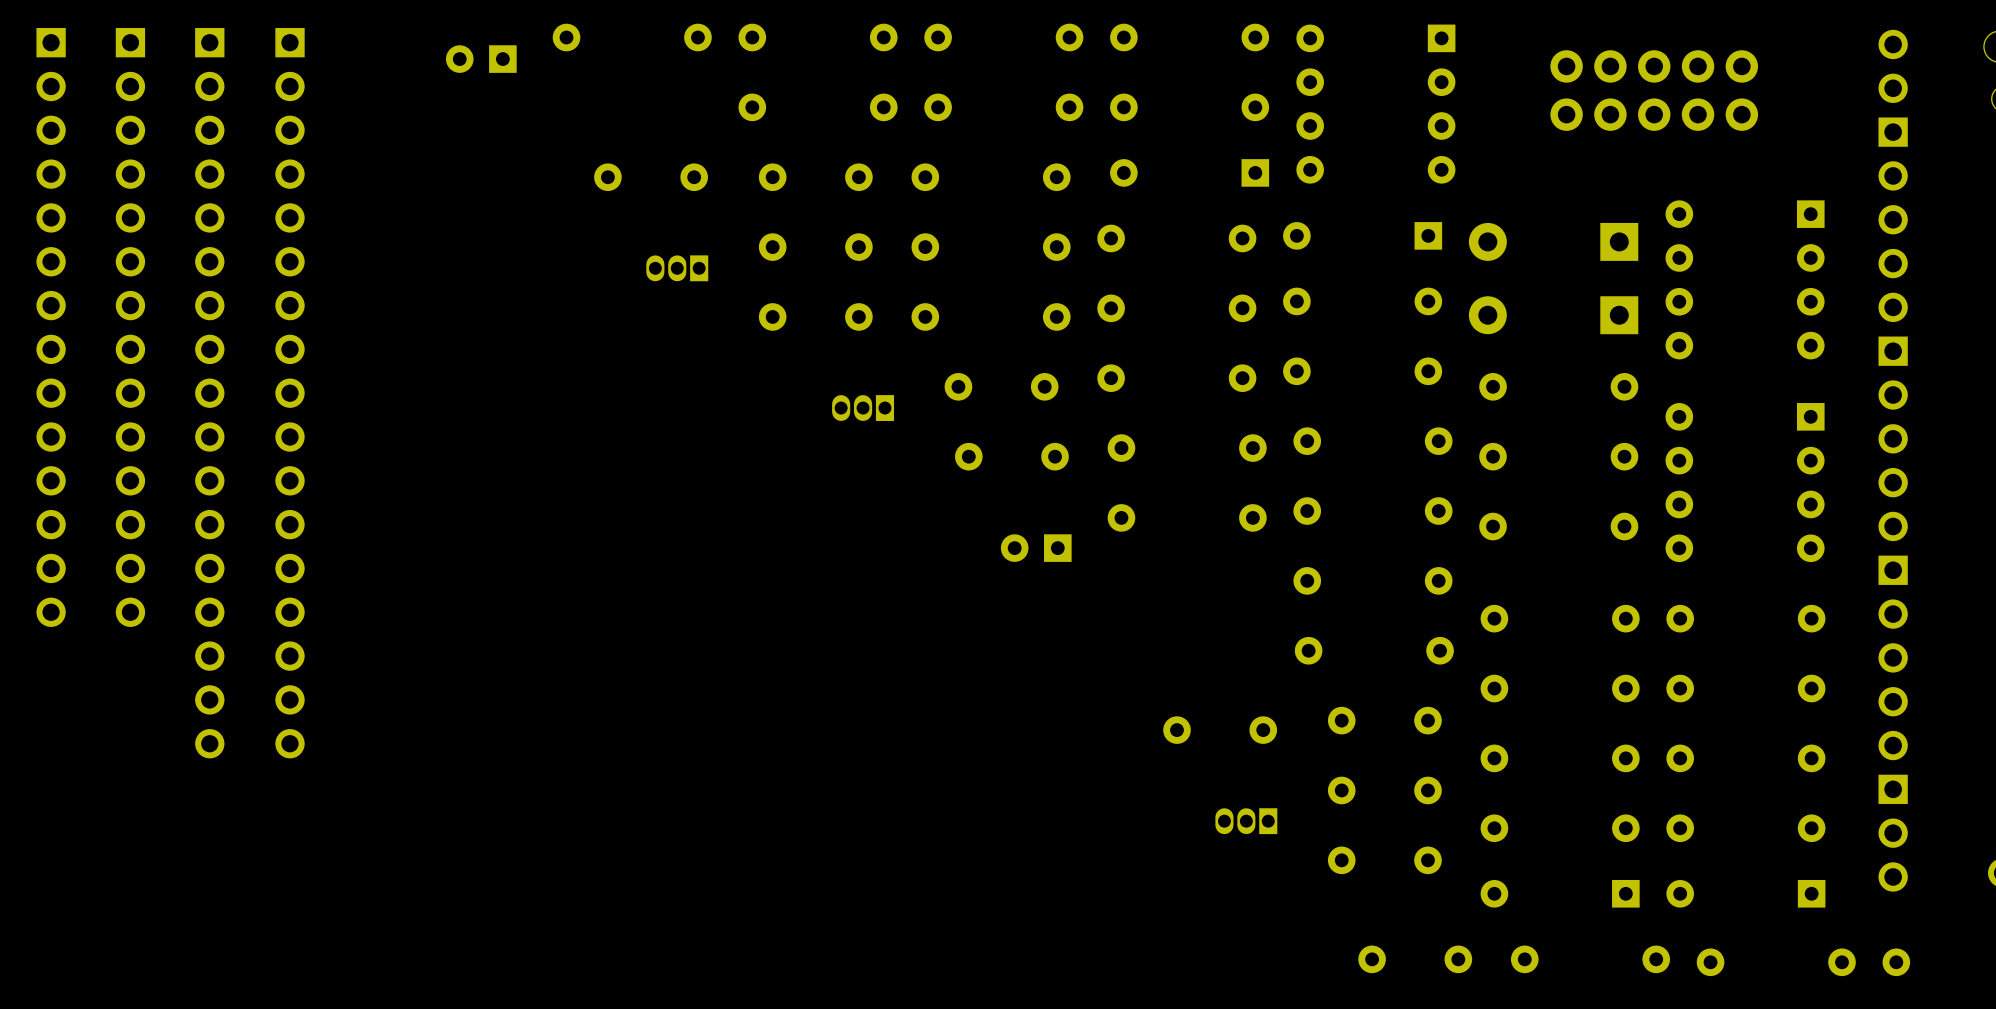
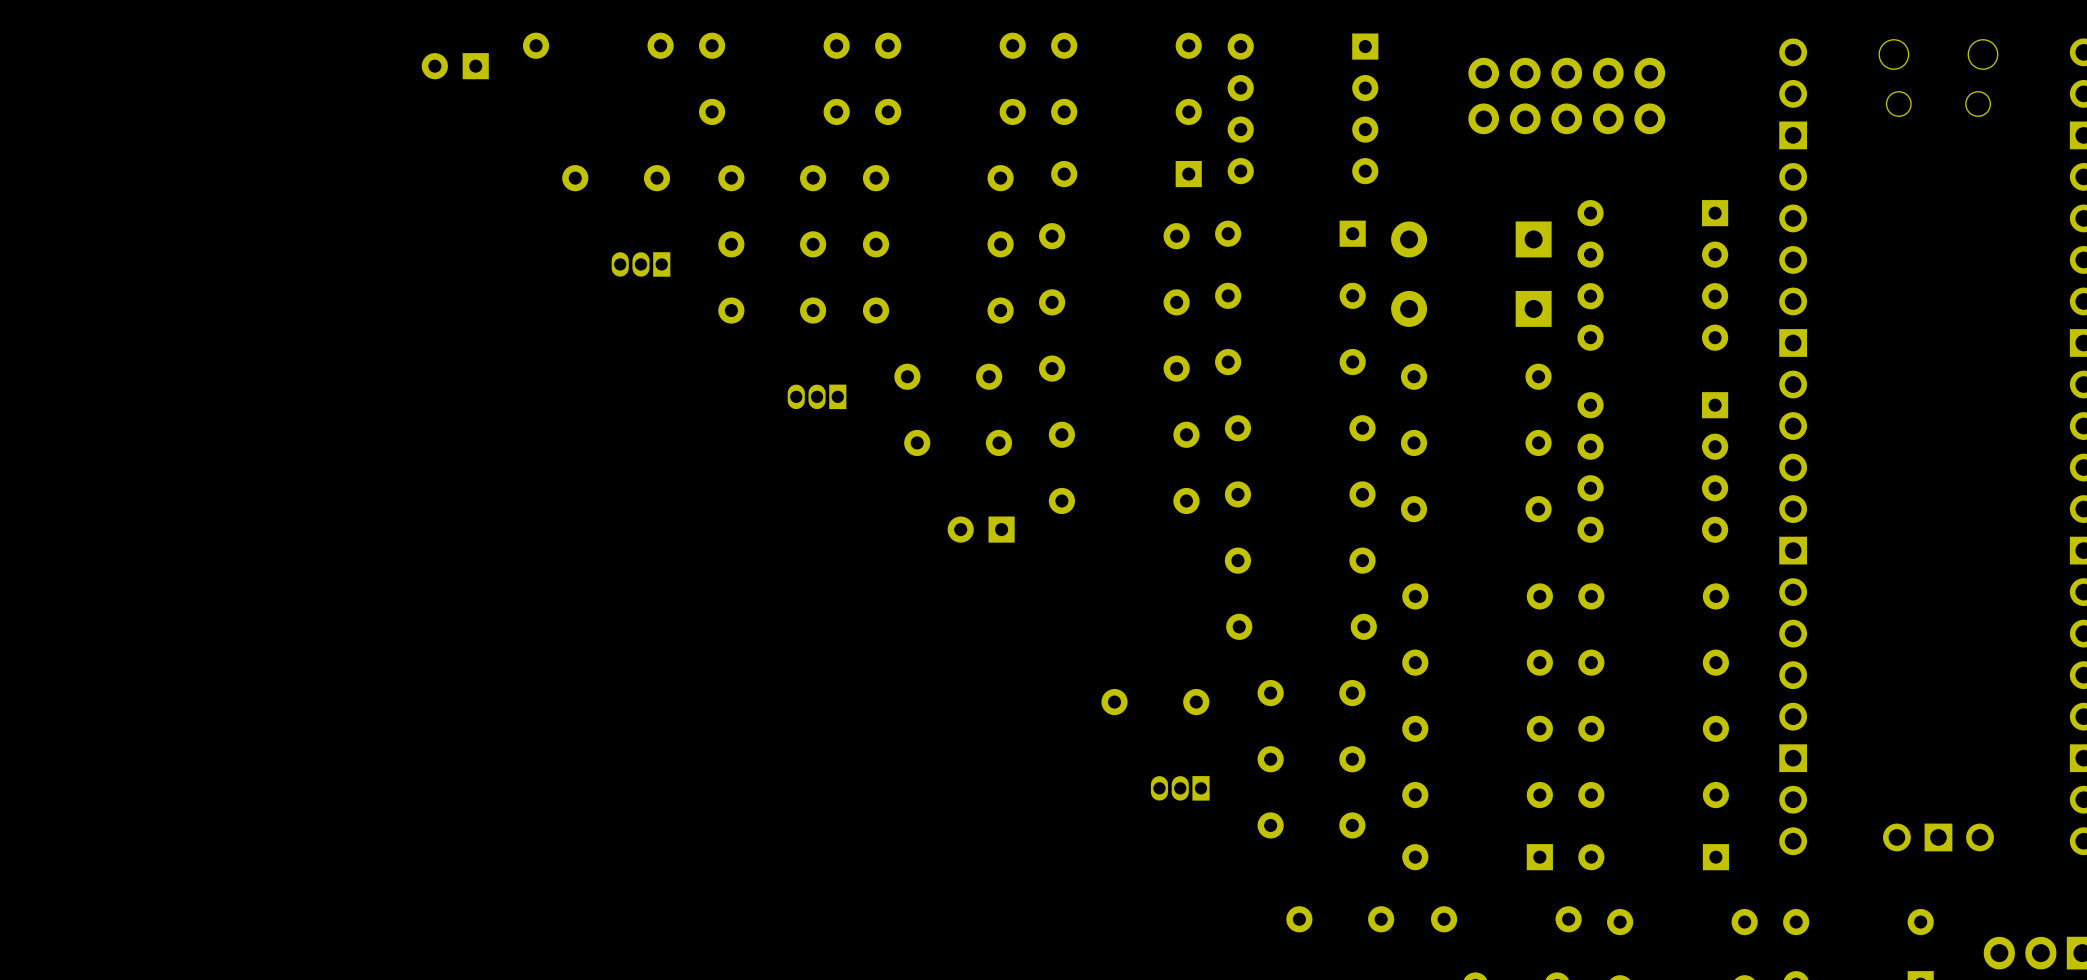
part: (51, 327) -> none
part: (130, 327) -> none
part: (209, 393) -> none
part: (290, 393) -> none

